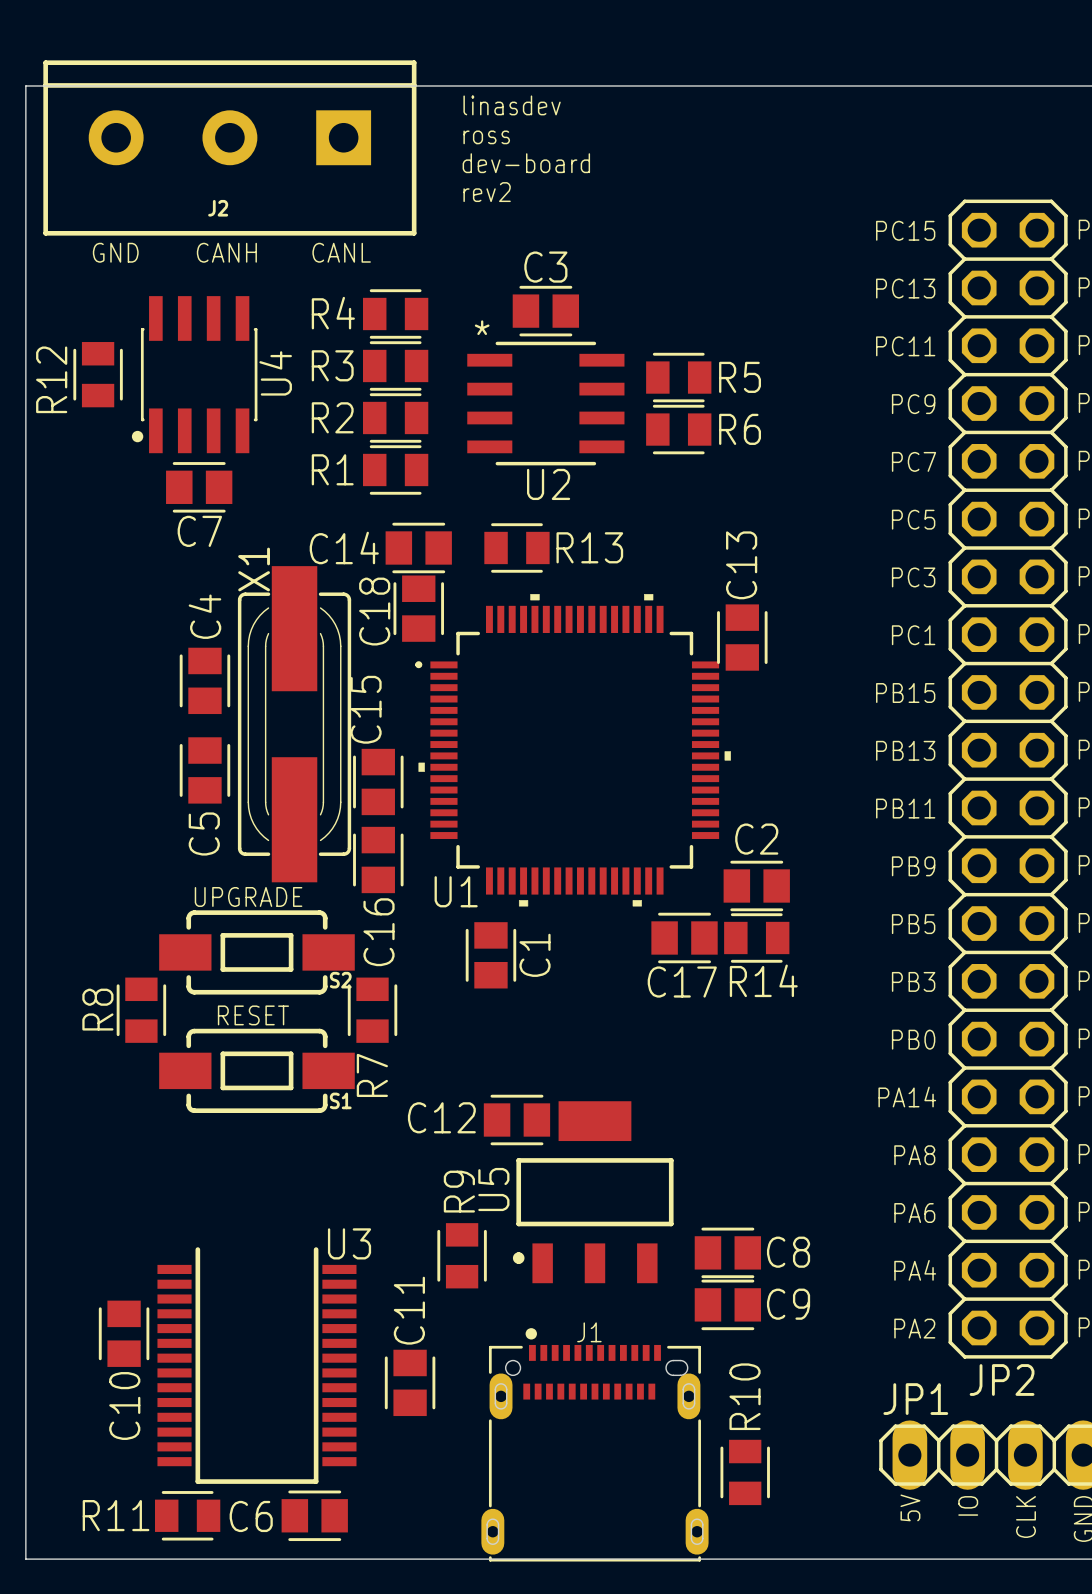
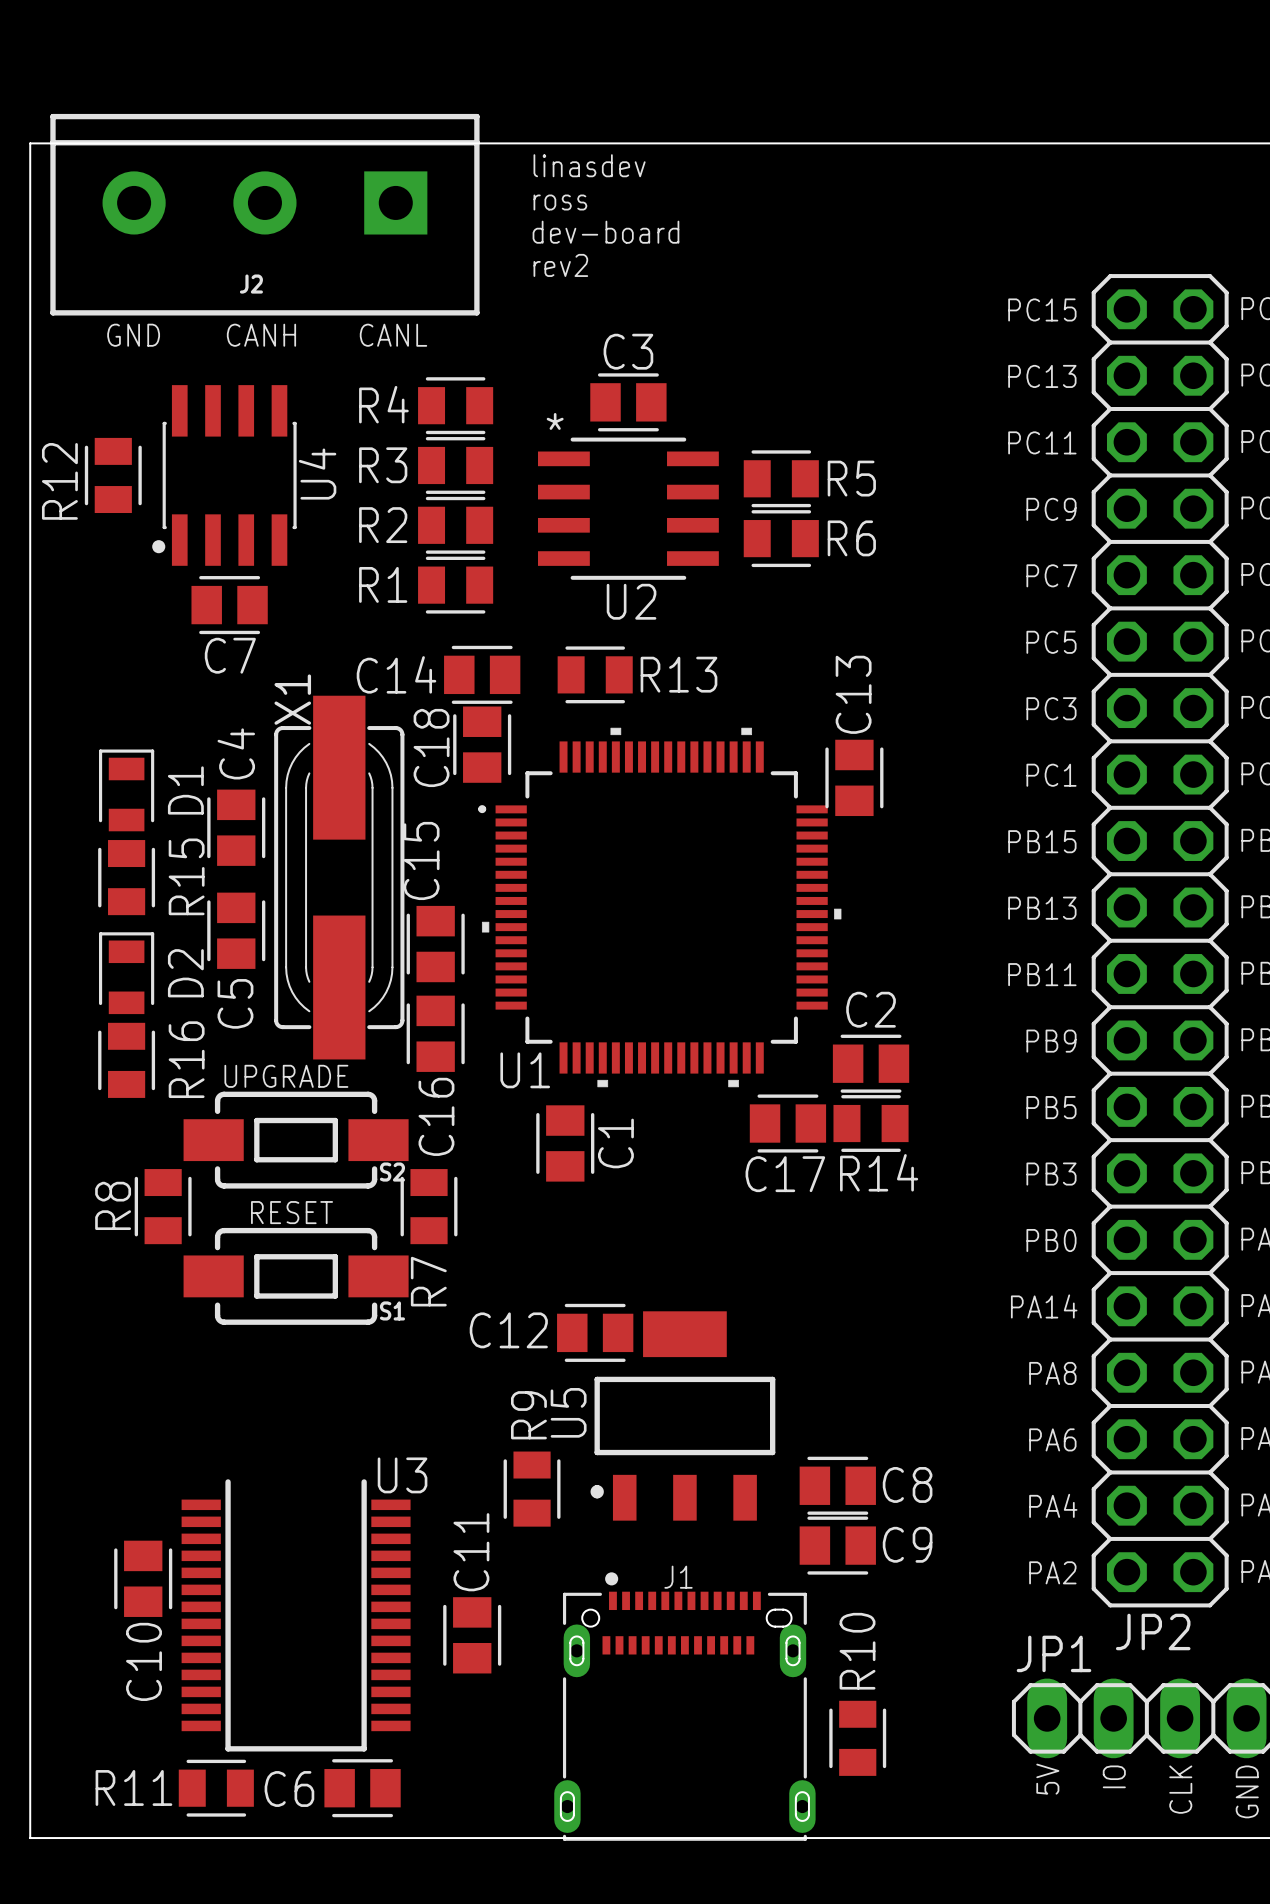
D1: none -> (126, 790)
R15: none -> (126, 877)
D2: none -> (126, 973)
R16: none -> (126, 1060)

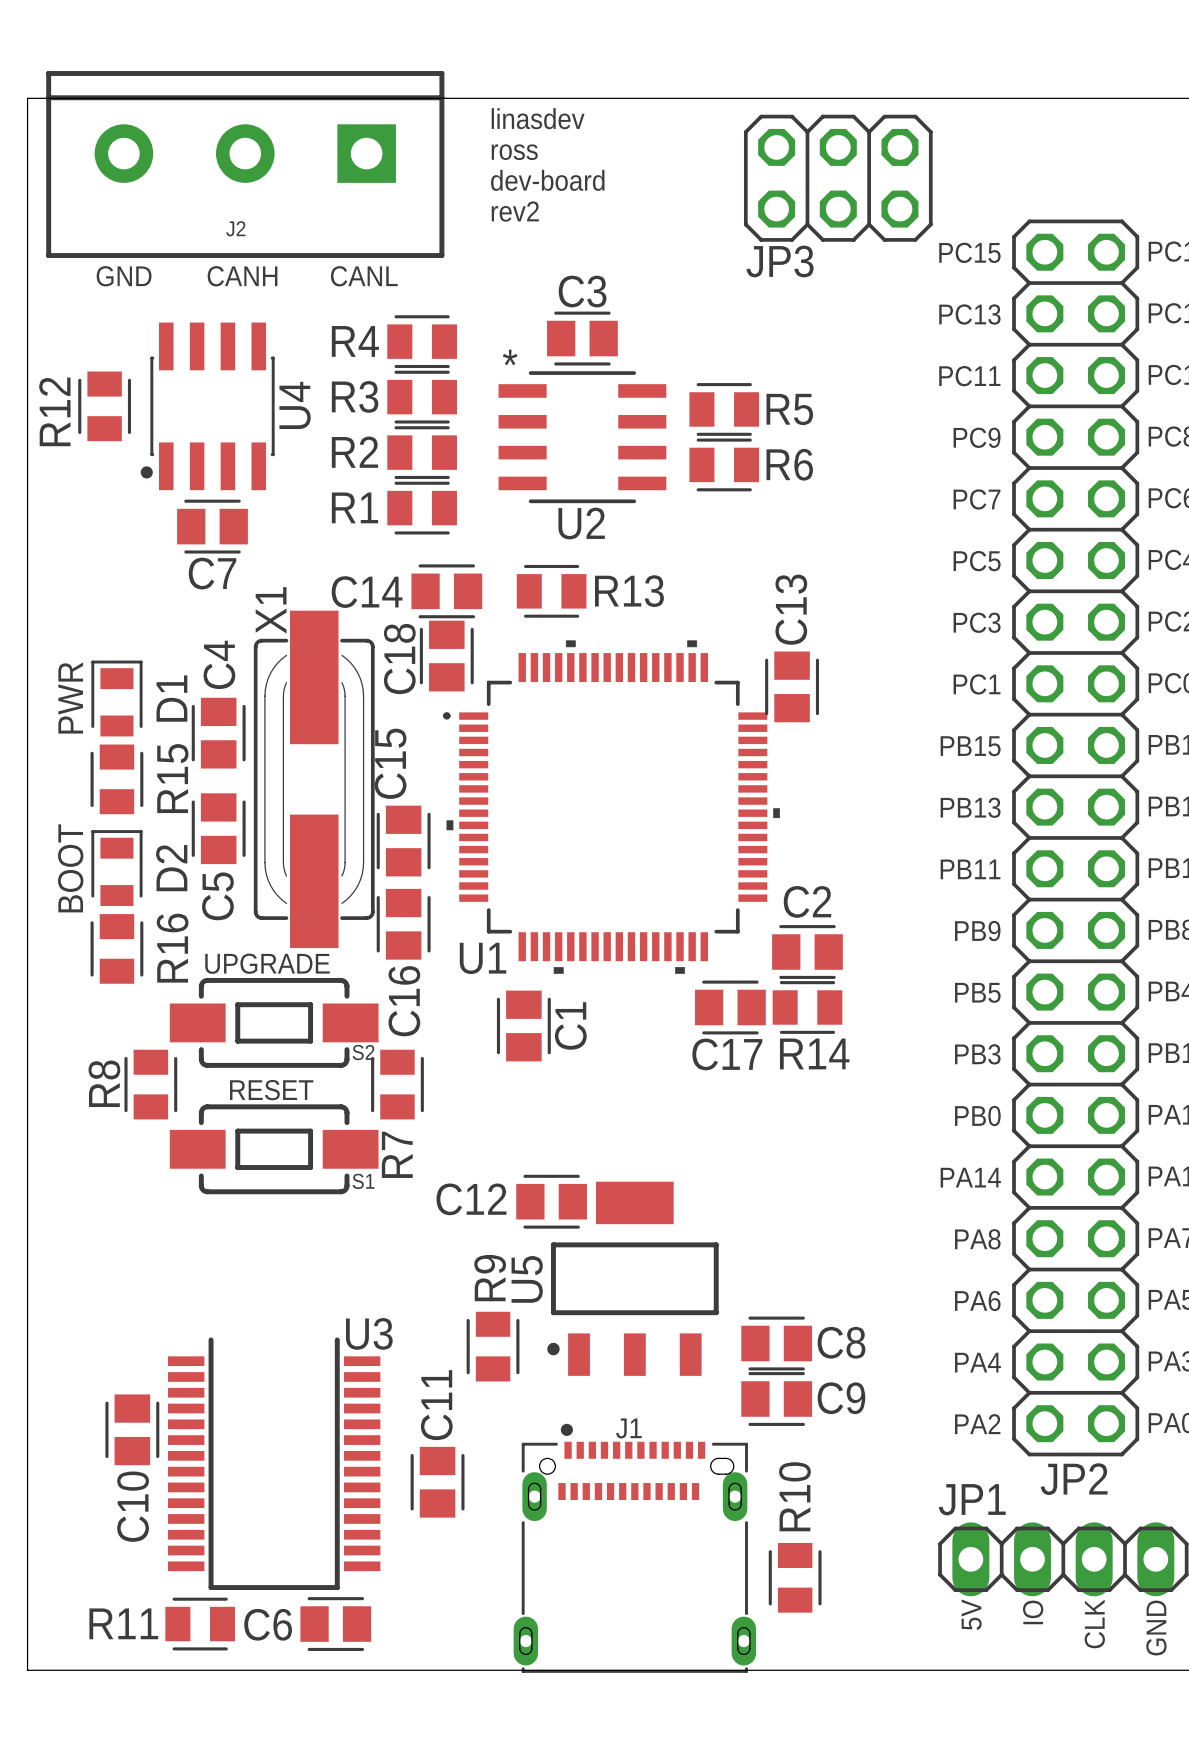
JP3: none -> (838, 178)
text: none -> PWR (70, 698)
text: none -> BOOT (70, 868)

